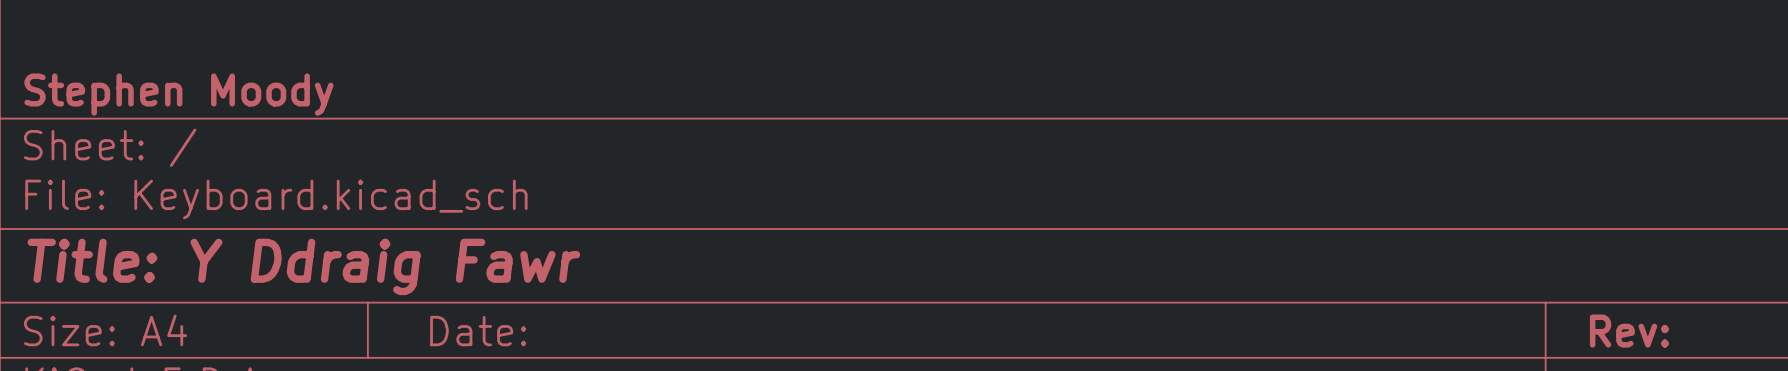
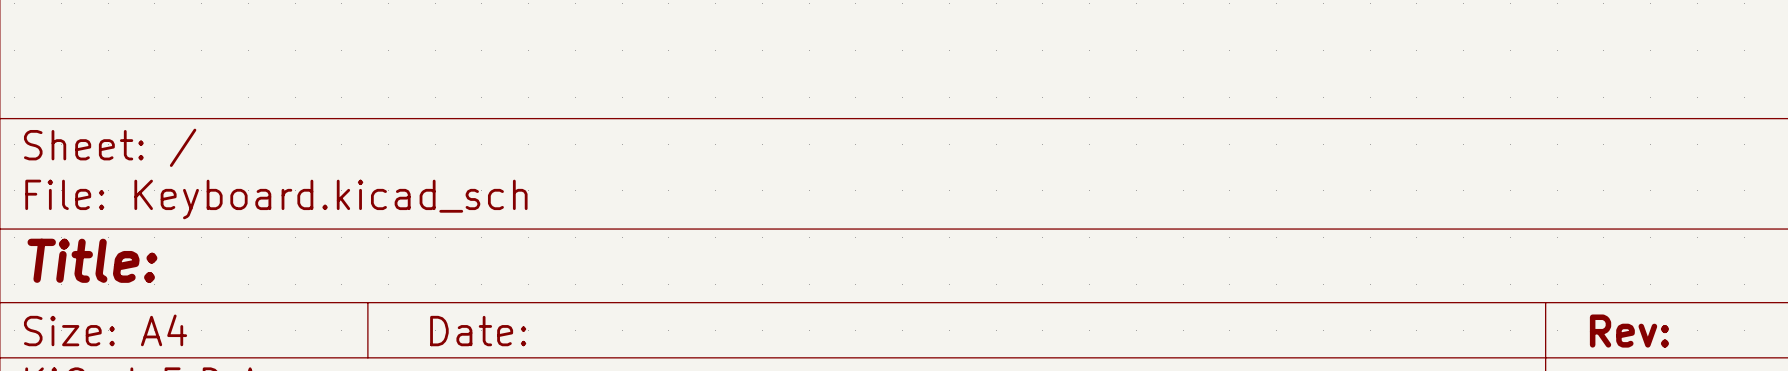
title block: Stephen Moody (178, 94) -> none
title block: Title: Y Ddraig Fawr (303, 266) -> Title: (92, 260)

